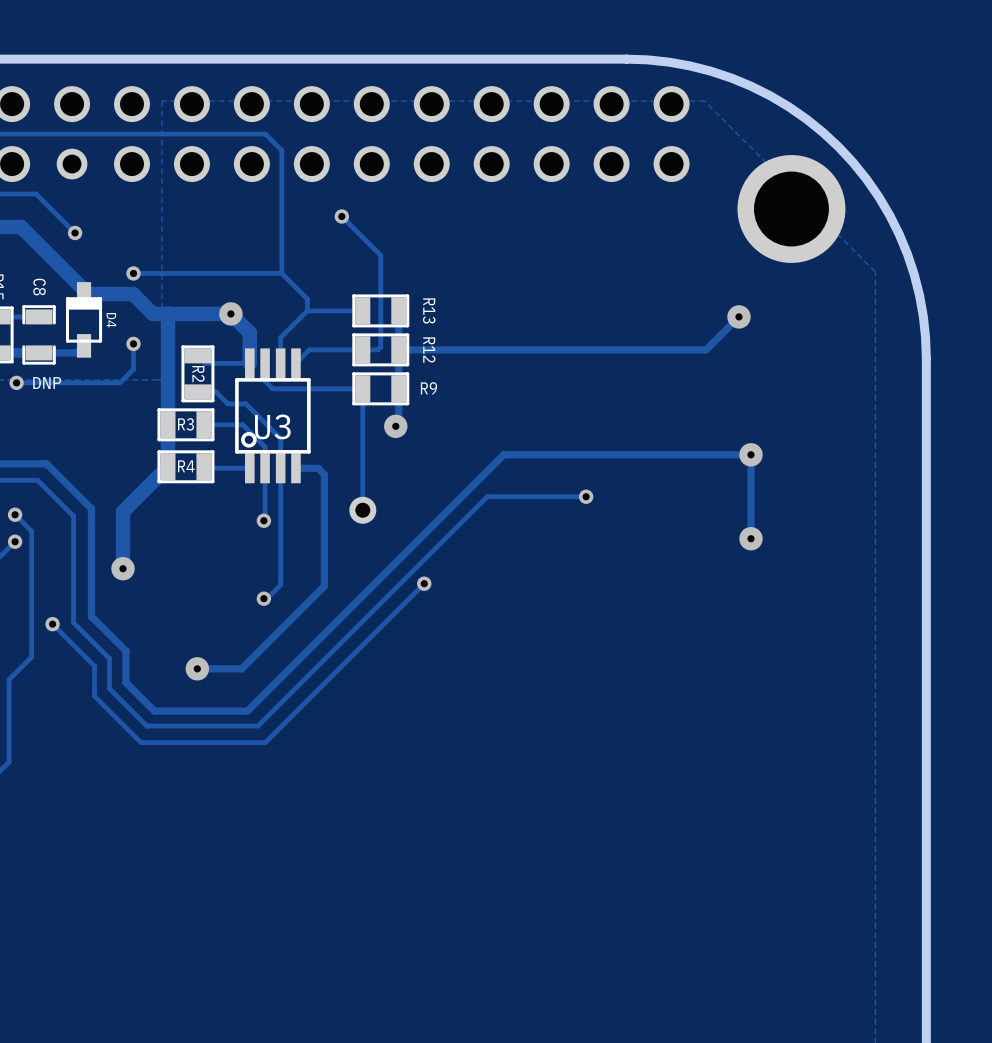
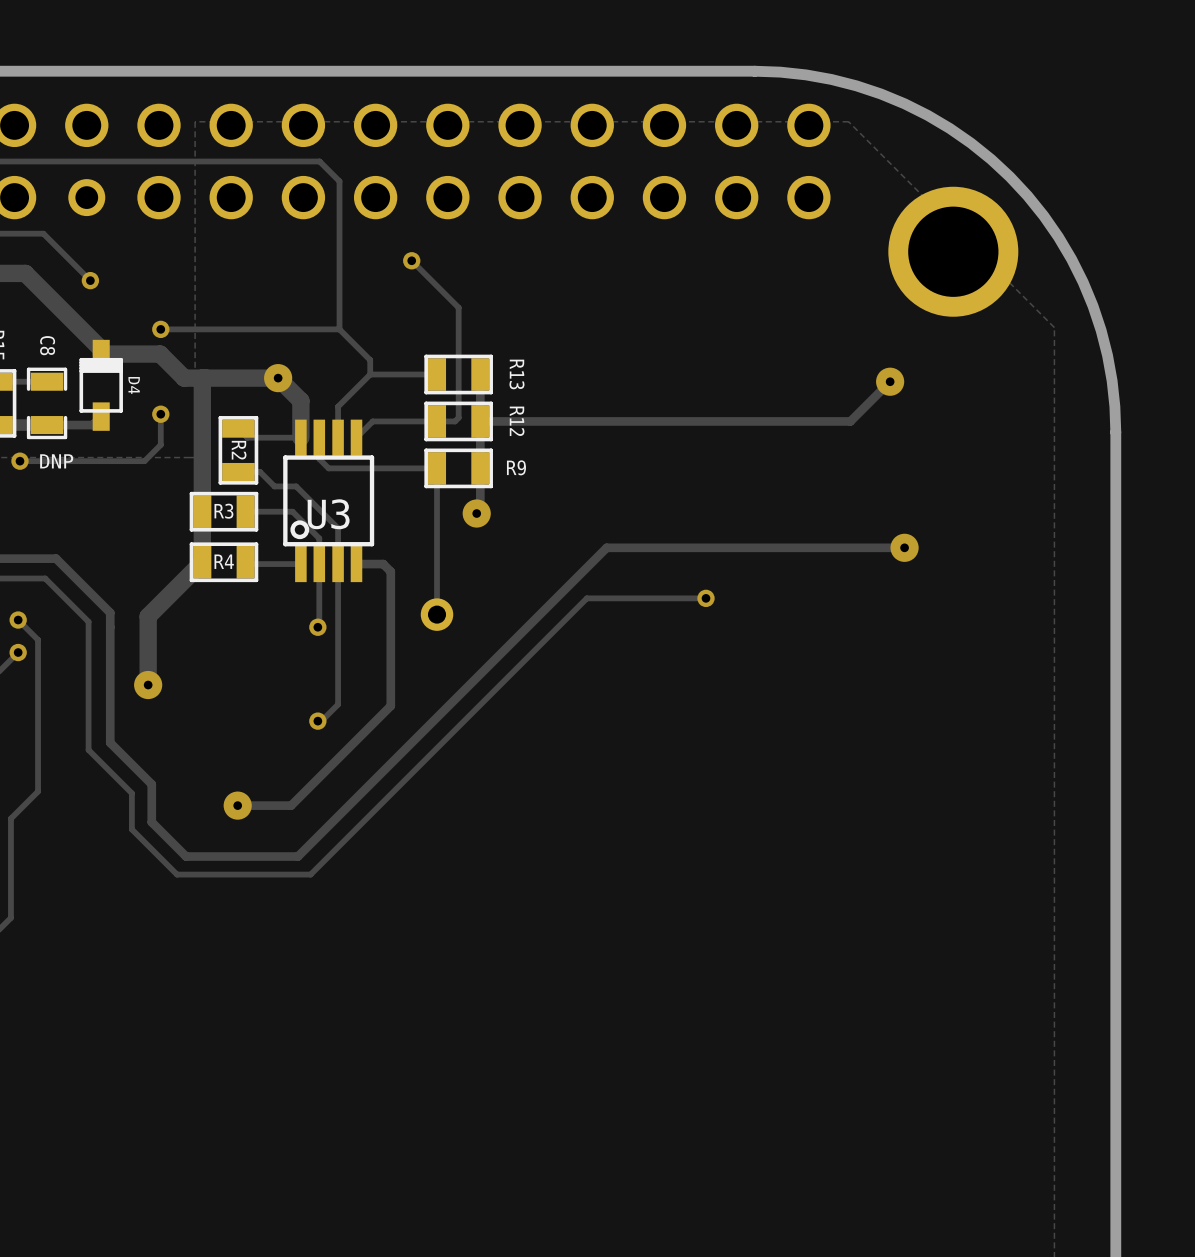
track: (750, 454) (750, 538) -> none
via: (750, 538) -> none
track: (424, 583) (265, 742) (140, 742) (94, 696) (94, 666) (52, 624) -> none
via: (424, 583) -> none
via: (52, 624) -> none

